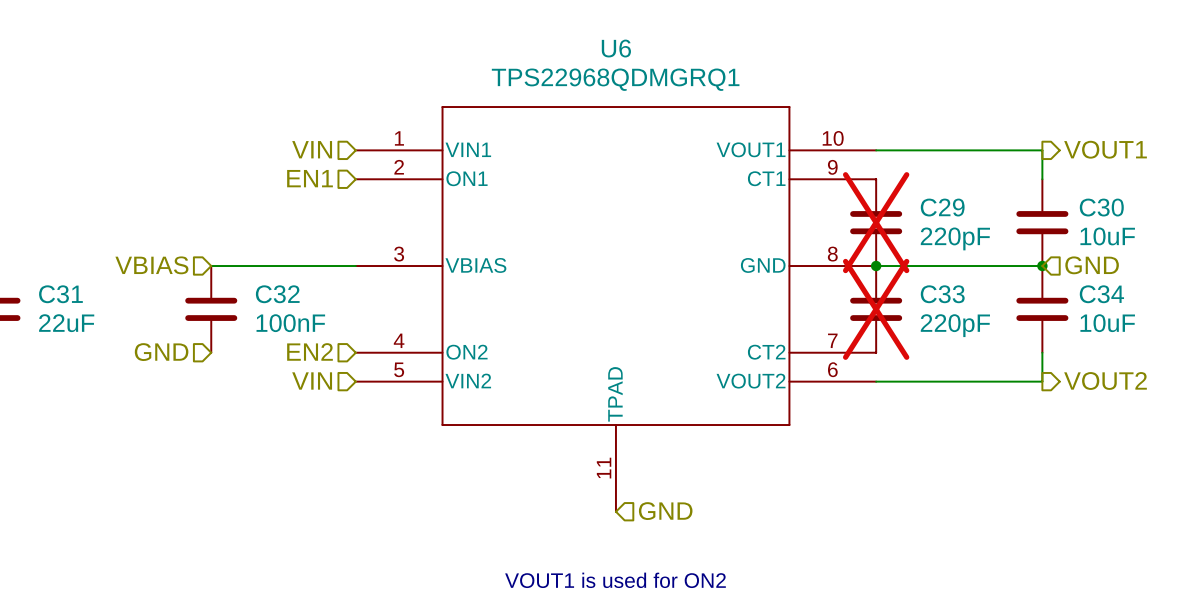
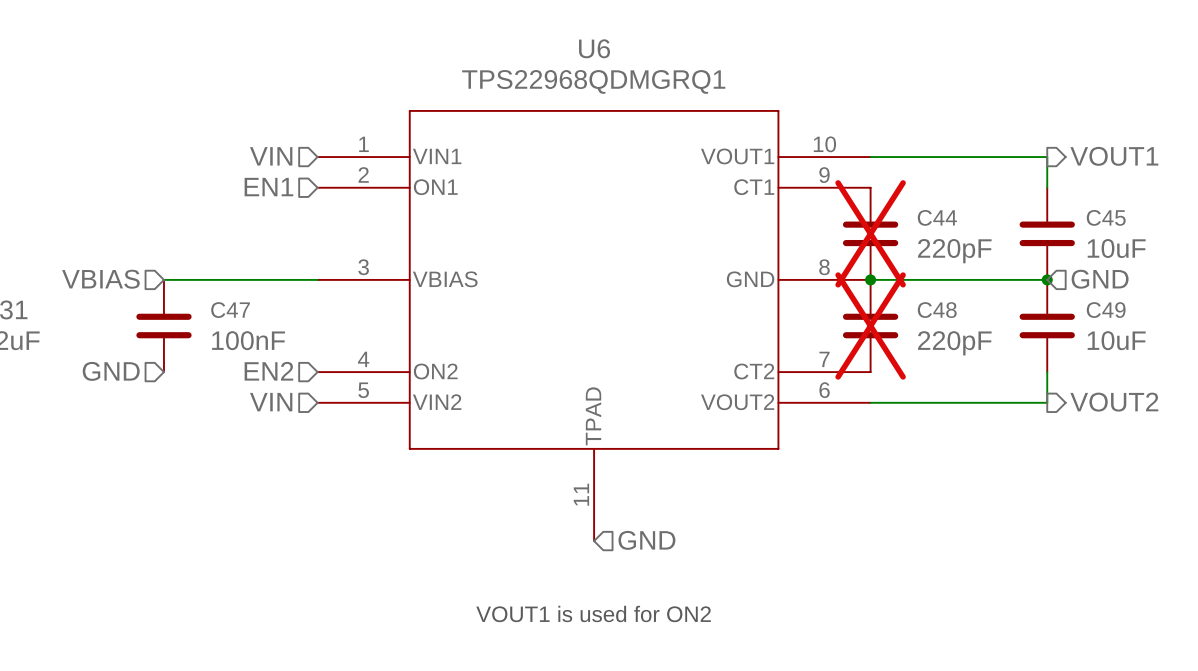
C29 name: C29 (942, 207) -> C44 (937, 217)
C30 name: C30 (1101, 207) -> C45 (1106, 217)
C32 name: C32 (277, 294) -> C47 (230, 310)
C33 name: C33 (942, 294) -> C48 (937, 310)
C34 name: C34 (1101, 294) -> C49 (1106, 310)

